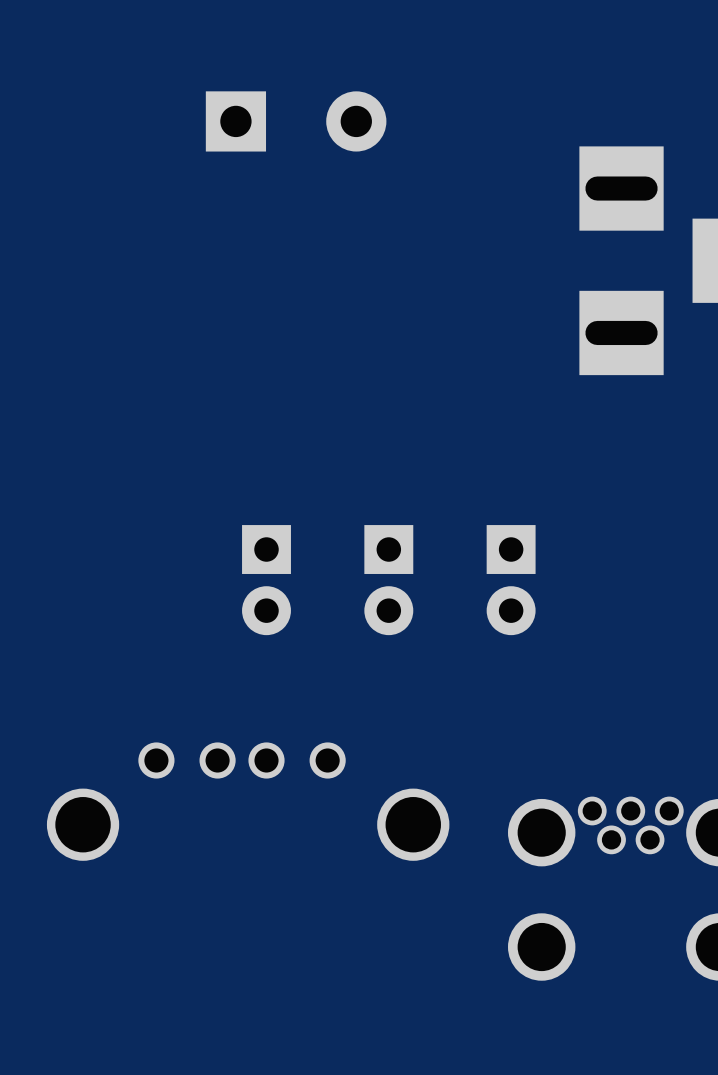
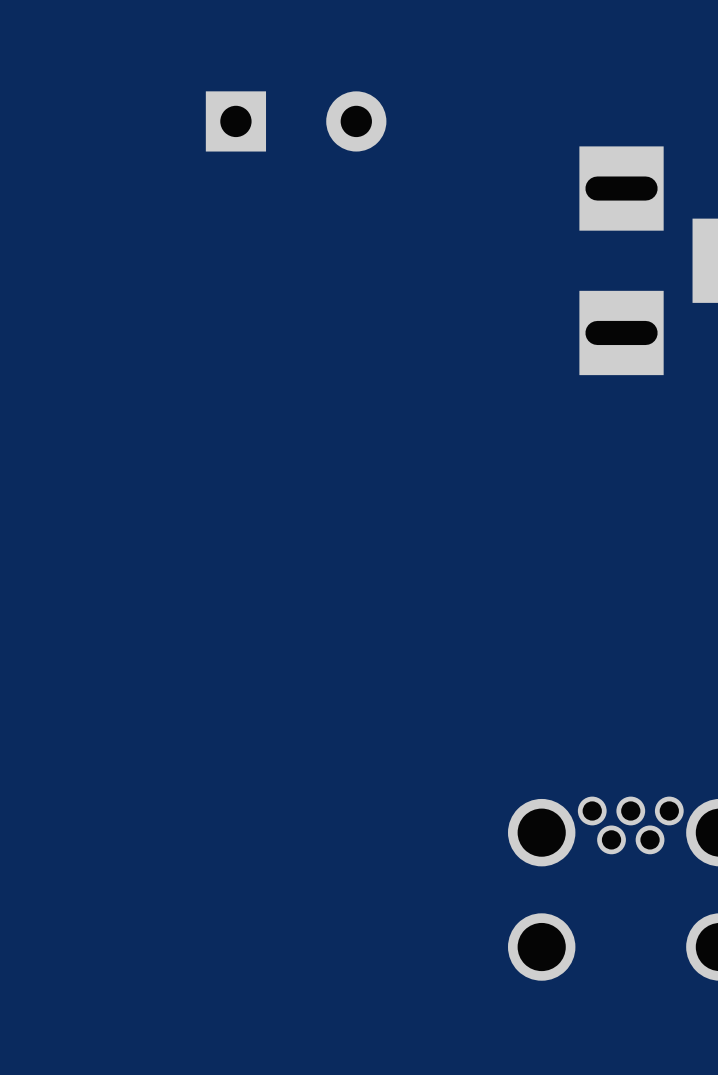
part: (266, 580) -> none
part: (388, 580) -> none
part: (511, 580) -> none
part: (248, 801) -> none

